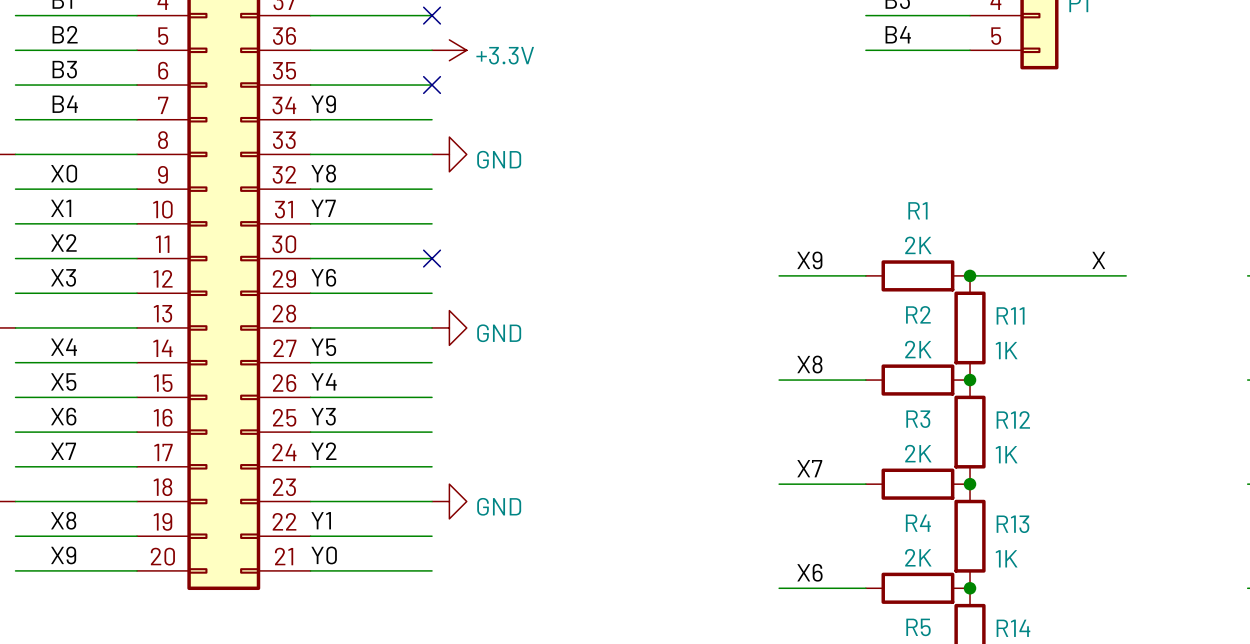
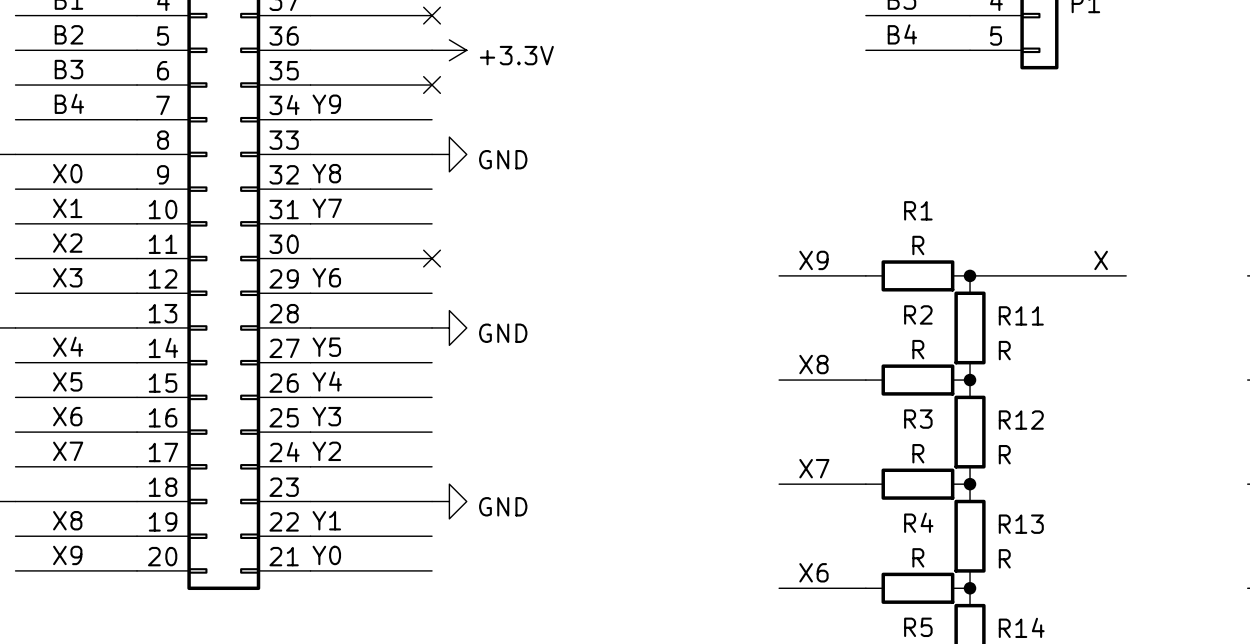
R1 value: 2K (918, 245) -> R (918, 245)
R2 value: 2K (918, 349) -> R (918, 349)
R11 value: 1K (1006, 350) -> R (1004, 350)
R3 value: 2K (918, 453) -> R (918, 453)
R12 value: 1K (1006, 454) -> R (1004, 454)
R4 value: 2K (918, 557) -> R (918, 557)
R13 value: 1K (1006, 558) -> R (1004, 558)

